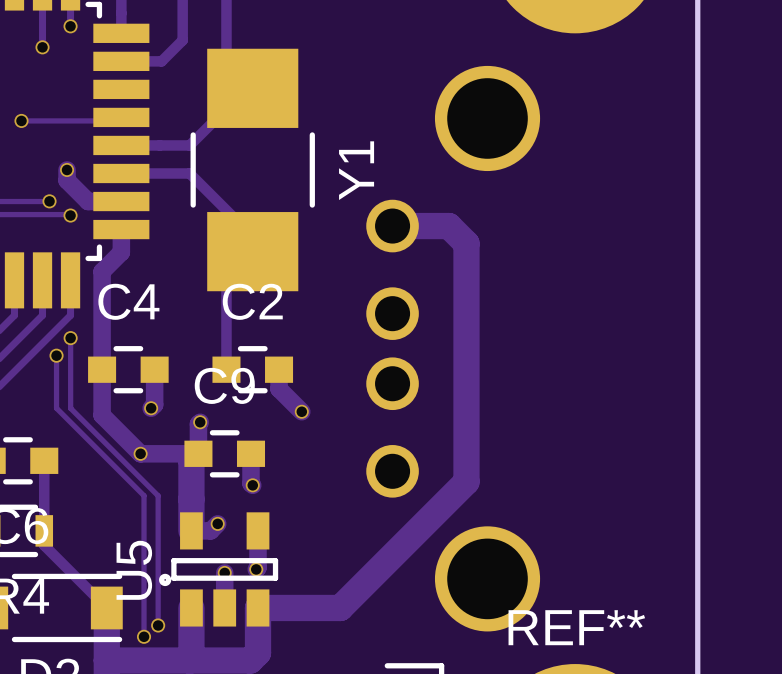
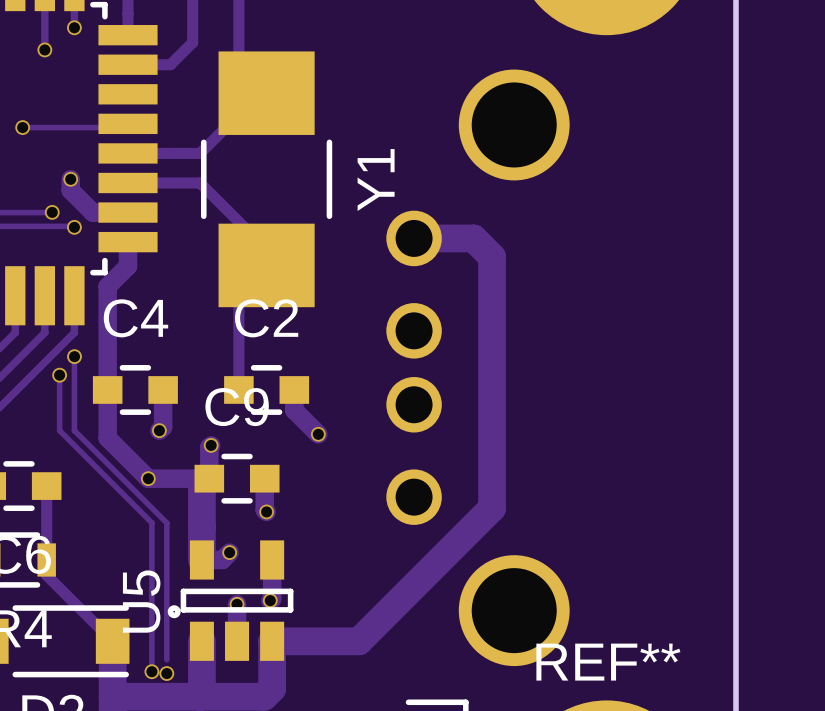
via position: (158, 625) -> (166, 673)

